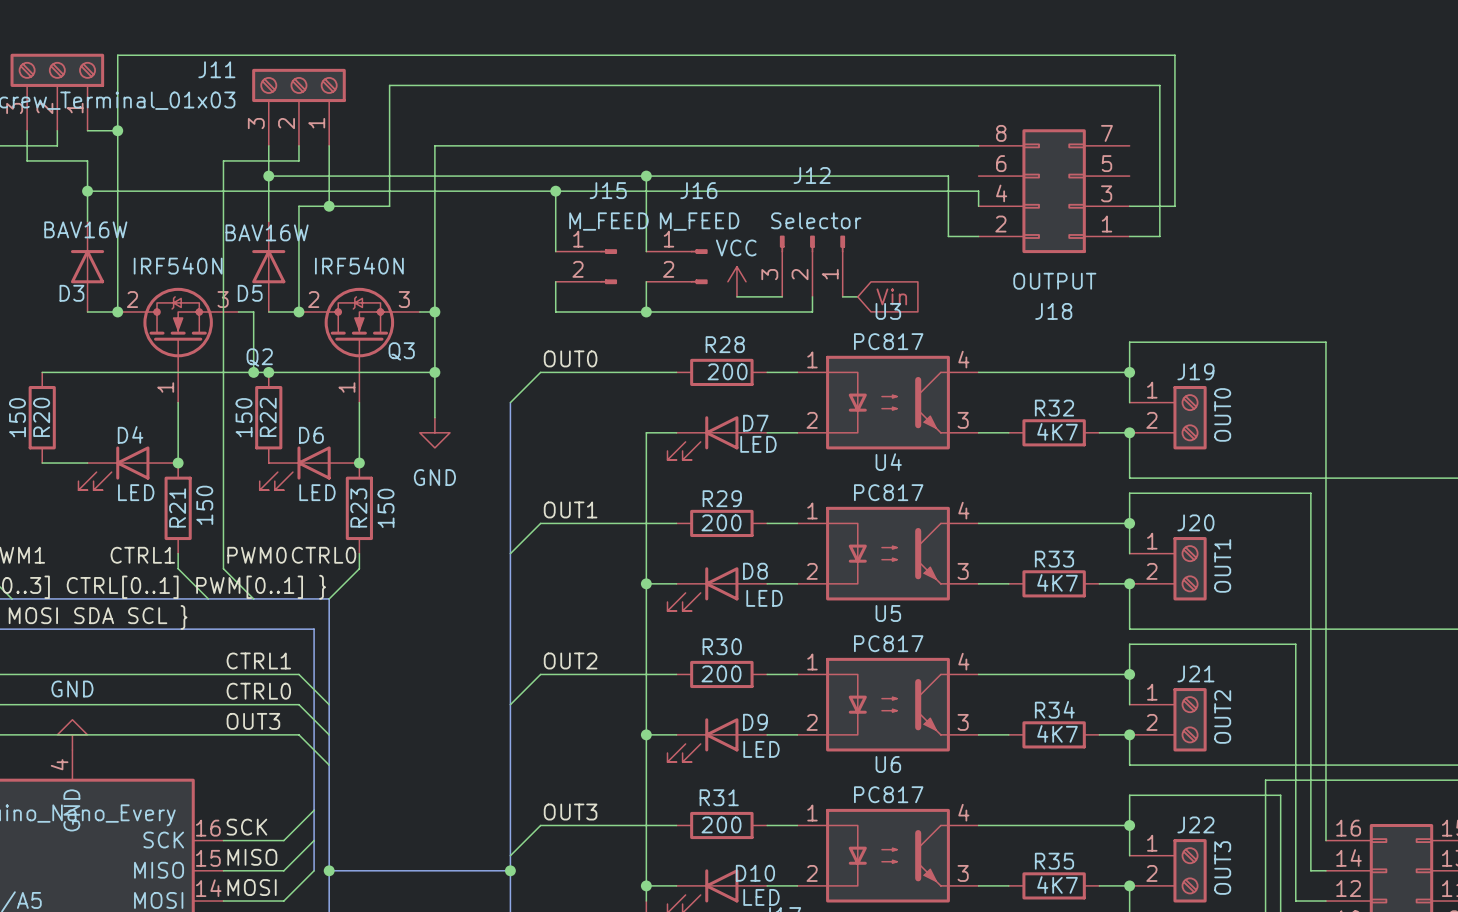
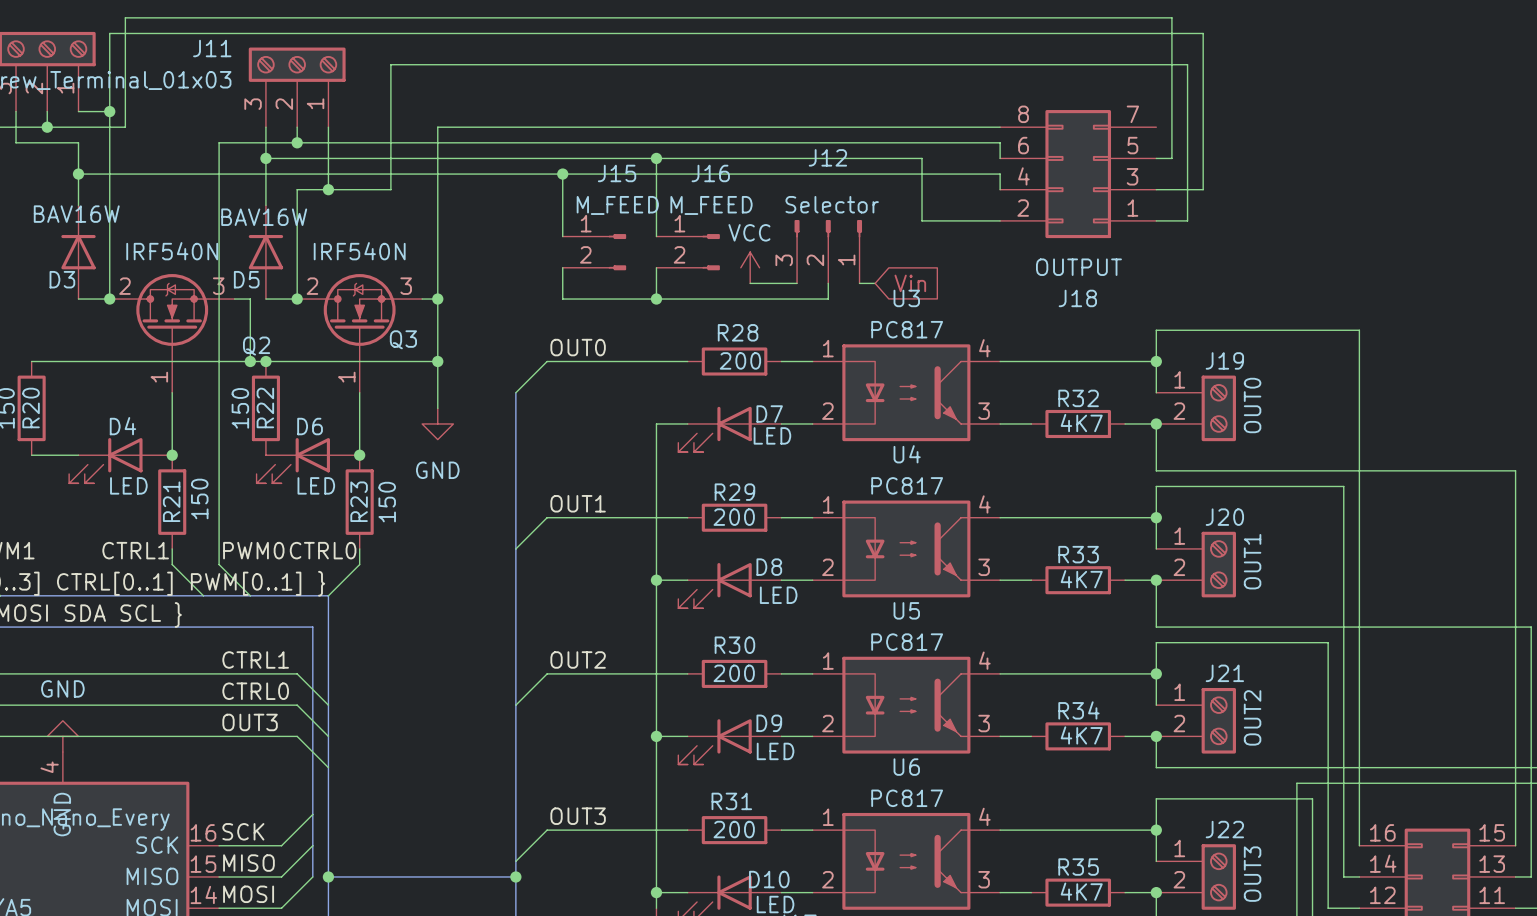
wire: none -> (47, 127) (125, 127) (125, 17) (1171, 17) (1171, 158) (1156, 158)
junction: none -> (47, 127)
wire: none -> (297, 142) (1000, 142) (1000, 158)
junction: none -> (297, 142)
wire: (903, 176) (948, 176) (948, 236) -> (922, 158) (922, 220) (968, 220)

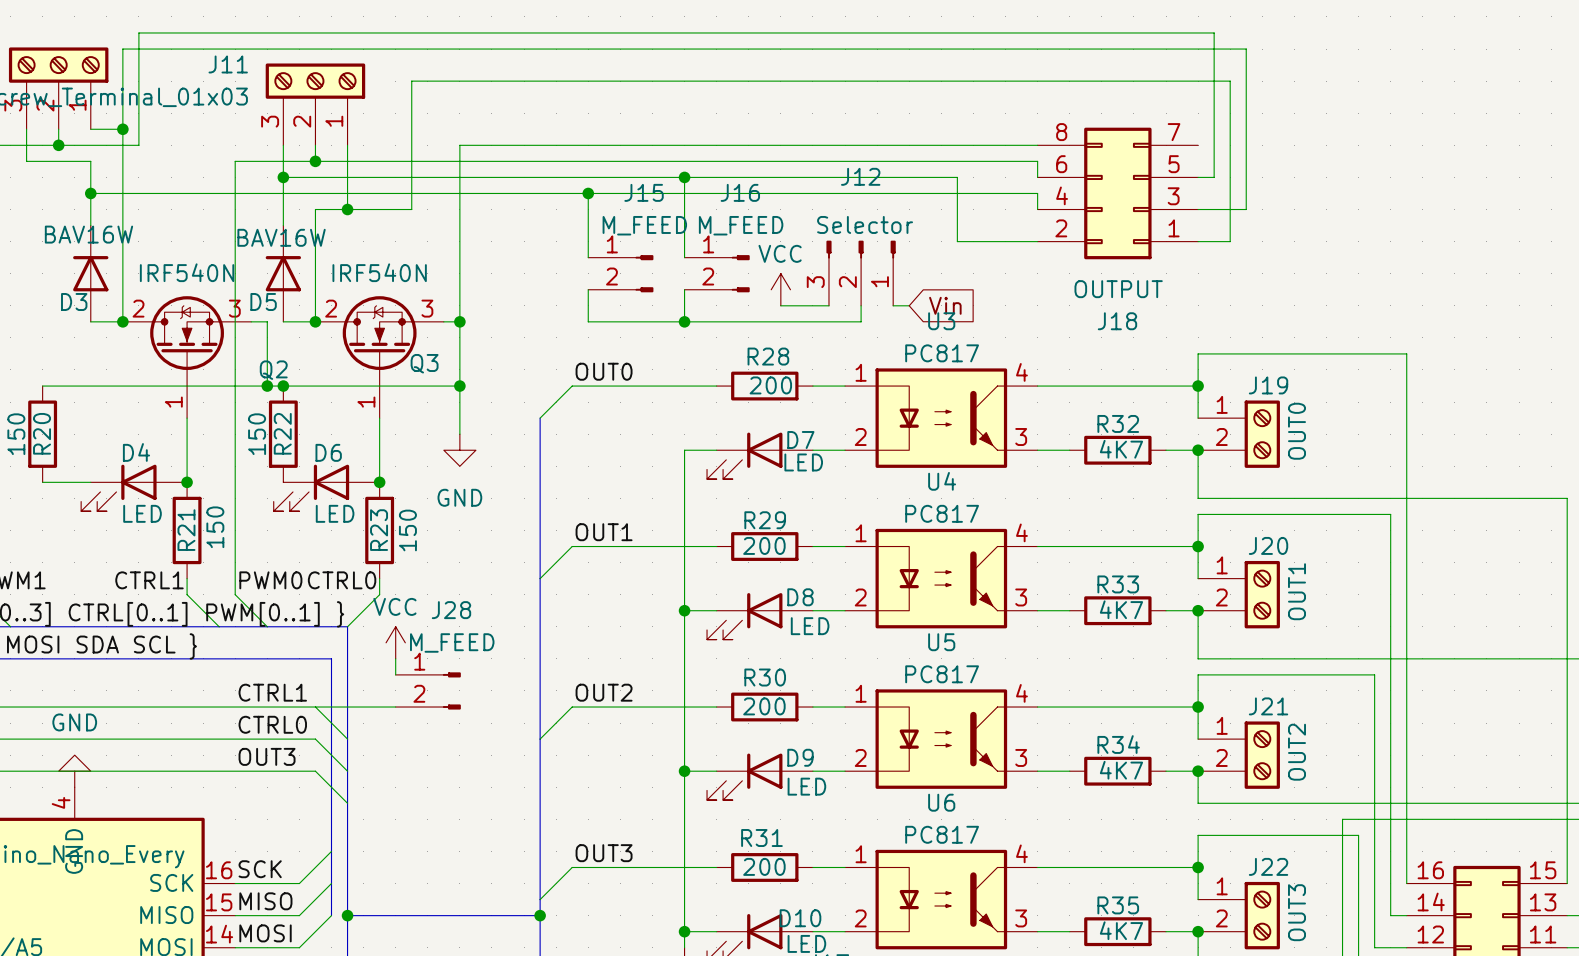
power symbol: none -> VCC (395, 642)
wire: none -> (395, 658) (395, 674)
J28: none -> M_FEED (428, 690)
wire: none -> (315, 707) (395, 707)

